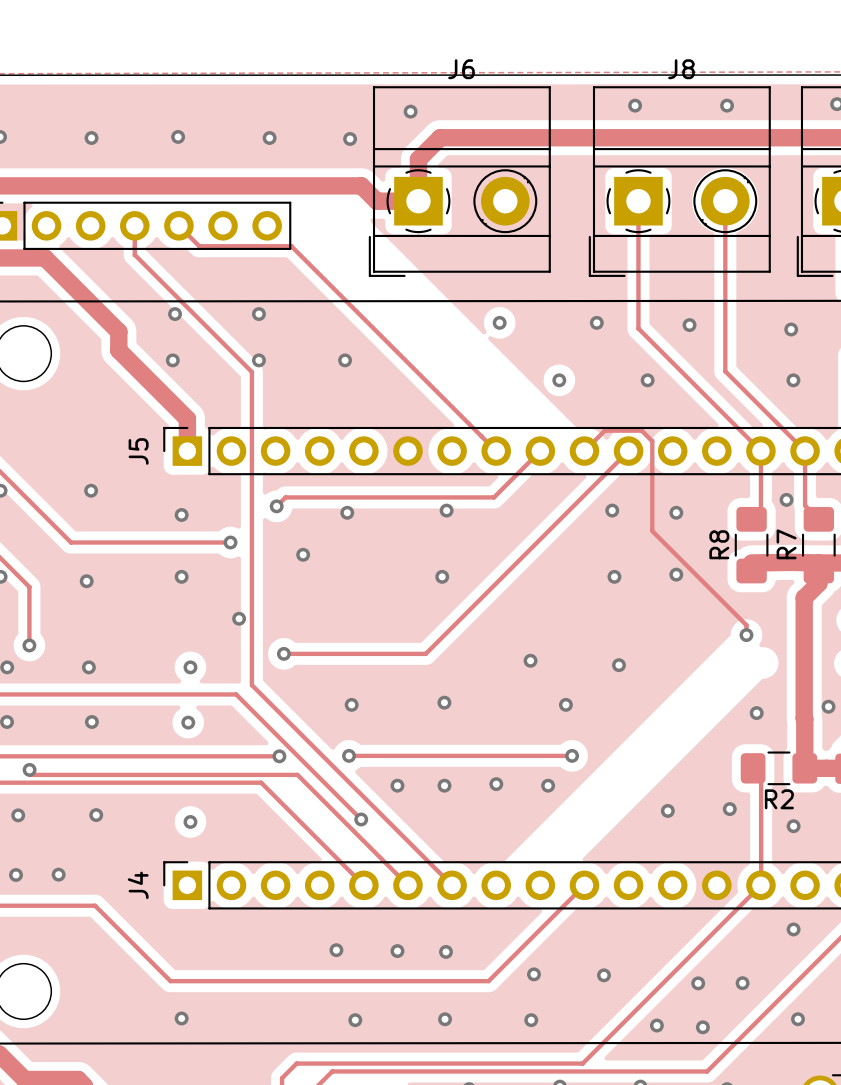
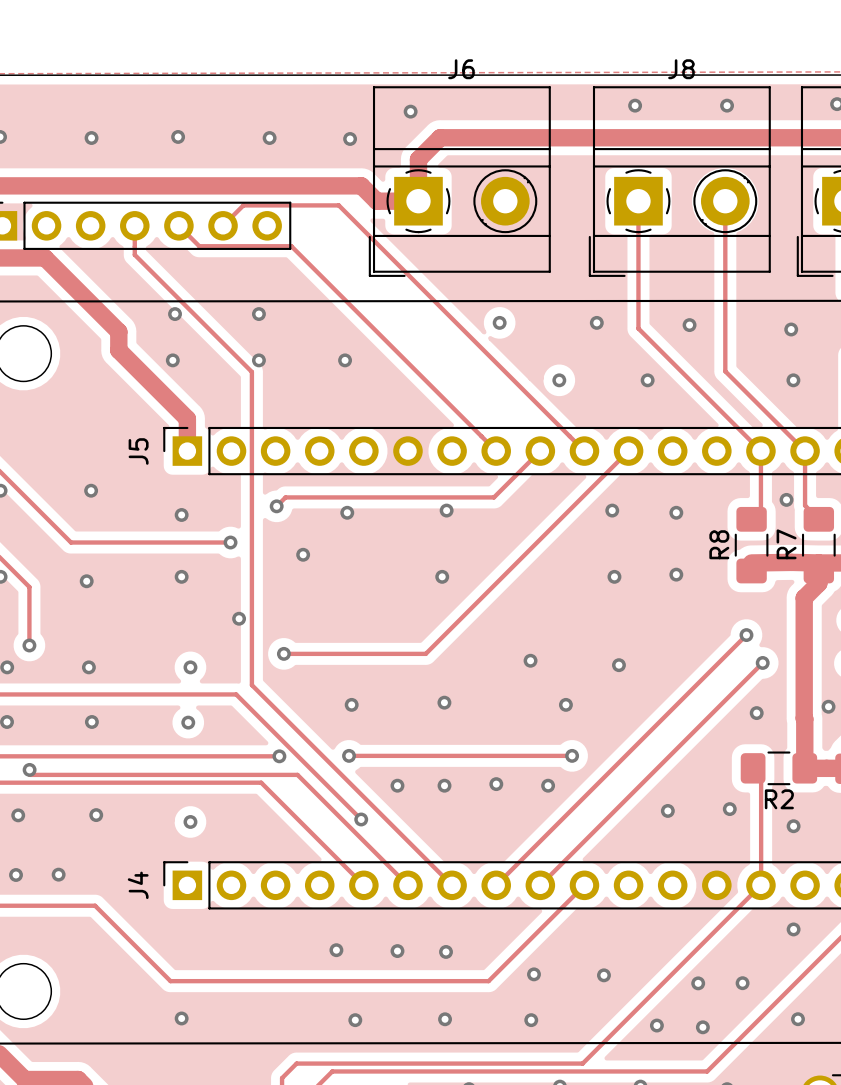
track: none -> (223, 225) (243, 205) (338, 205) (584, 451)
track: (584, 451) (604, 430) (641, 430) (652, 441) (652, 531) (746, 625) (746, 635) -> (496, 885) (746, 635)
track: none -> (762, 662) (540, 885)
via: none -> (762, 662)

